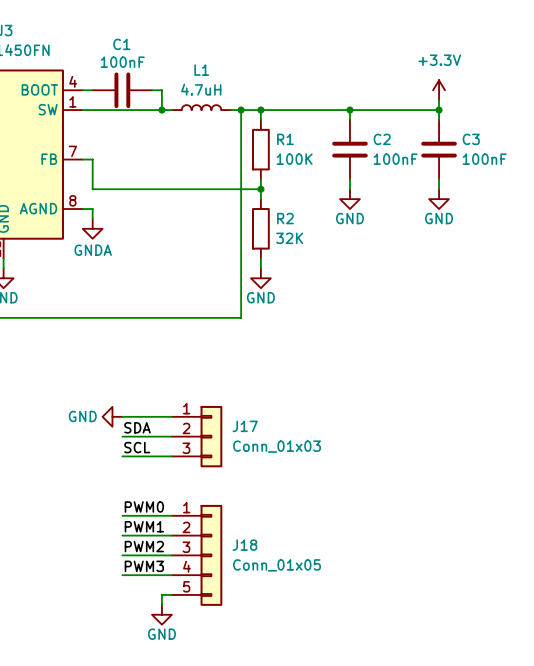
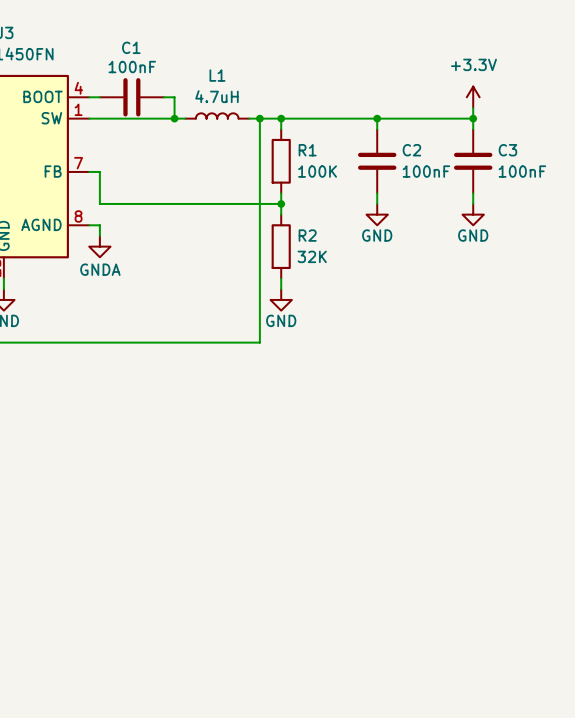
power symbol: GND (112, 416) -> none
wire: (122, 416) (171, 416) -> none
label: SDA (137, 427) -> none
wire: (122, 436) (171, 436) -> none
J17: Conn_01x03 (197, 436) -> none
label: SCL (137, 447) -> none
wire: (122, 456) (171, 456) -> none
label: PWM0 (144, 506) -> none
wire: (122, 515) (171, 515) -> none
label: PWM1 (144, 526) -> none
wire: (122, 535) (171, 535) -> none
label: PWM2 (144, 546) -> none
wire: (122, 555) (171, 555) -> none
J18: Conn_01x05 (197, 555) -> none
label: PWM3 (144, 566) -> none
wire: (122, 575) (171, 575) -> none
wire: (171, 594) (161, 594) (161, 604) -> none
power symbol: GND (161, 614) -> none

